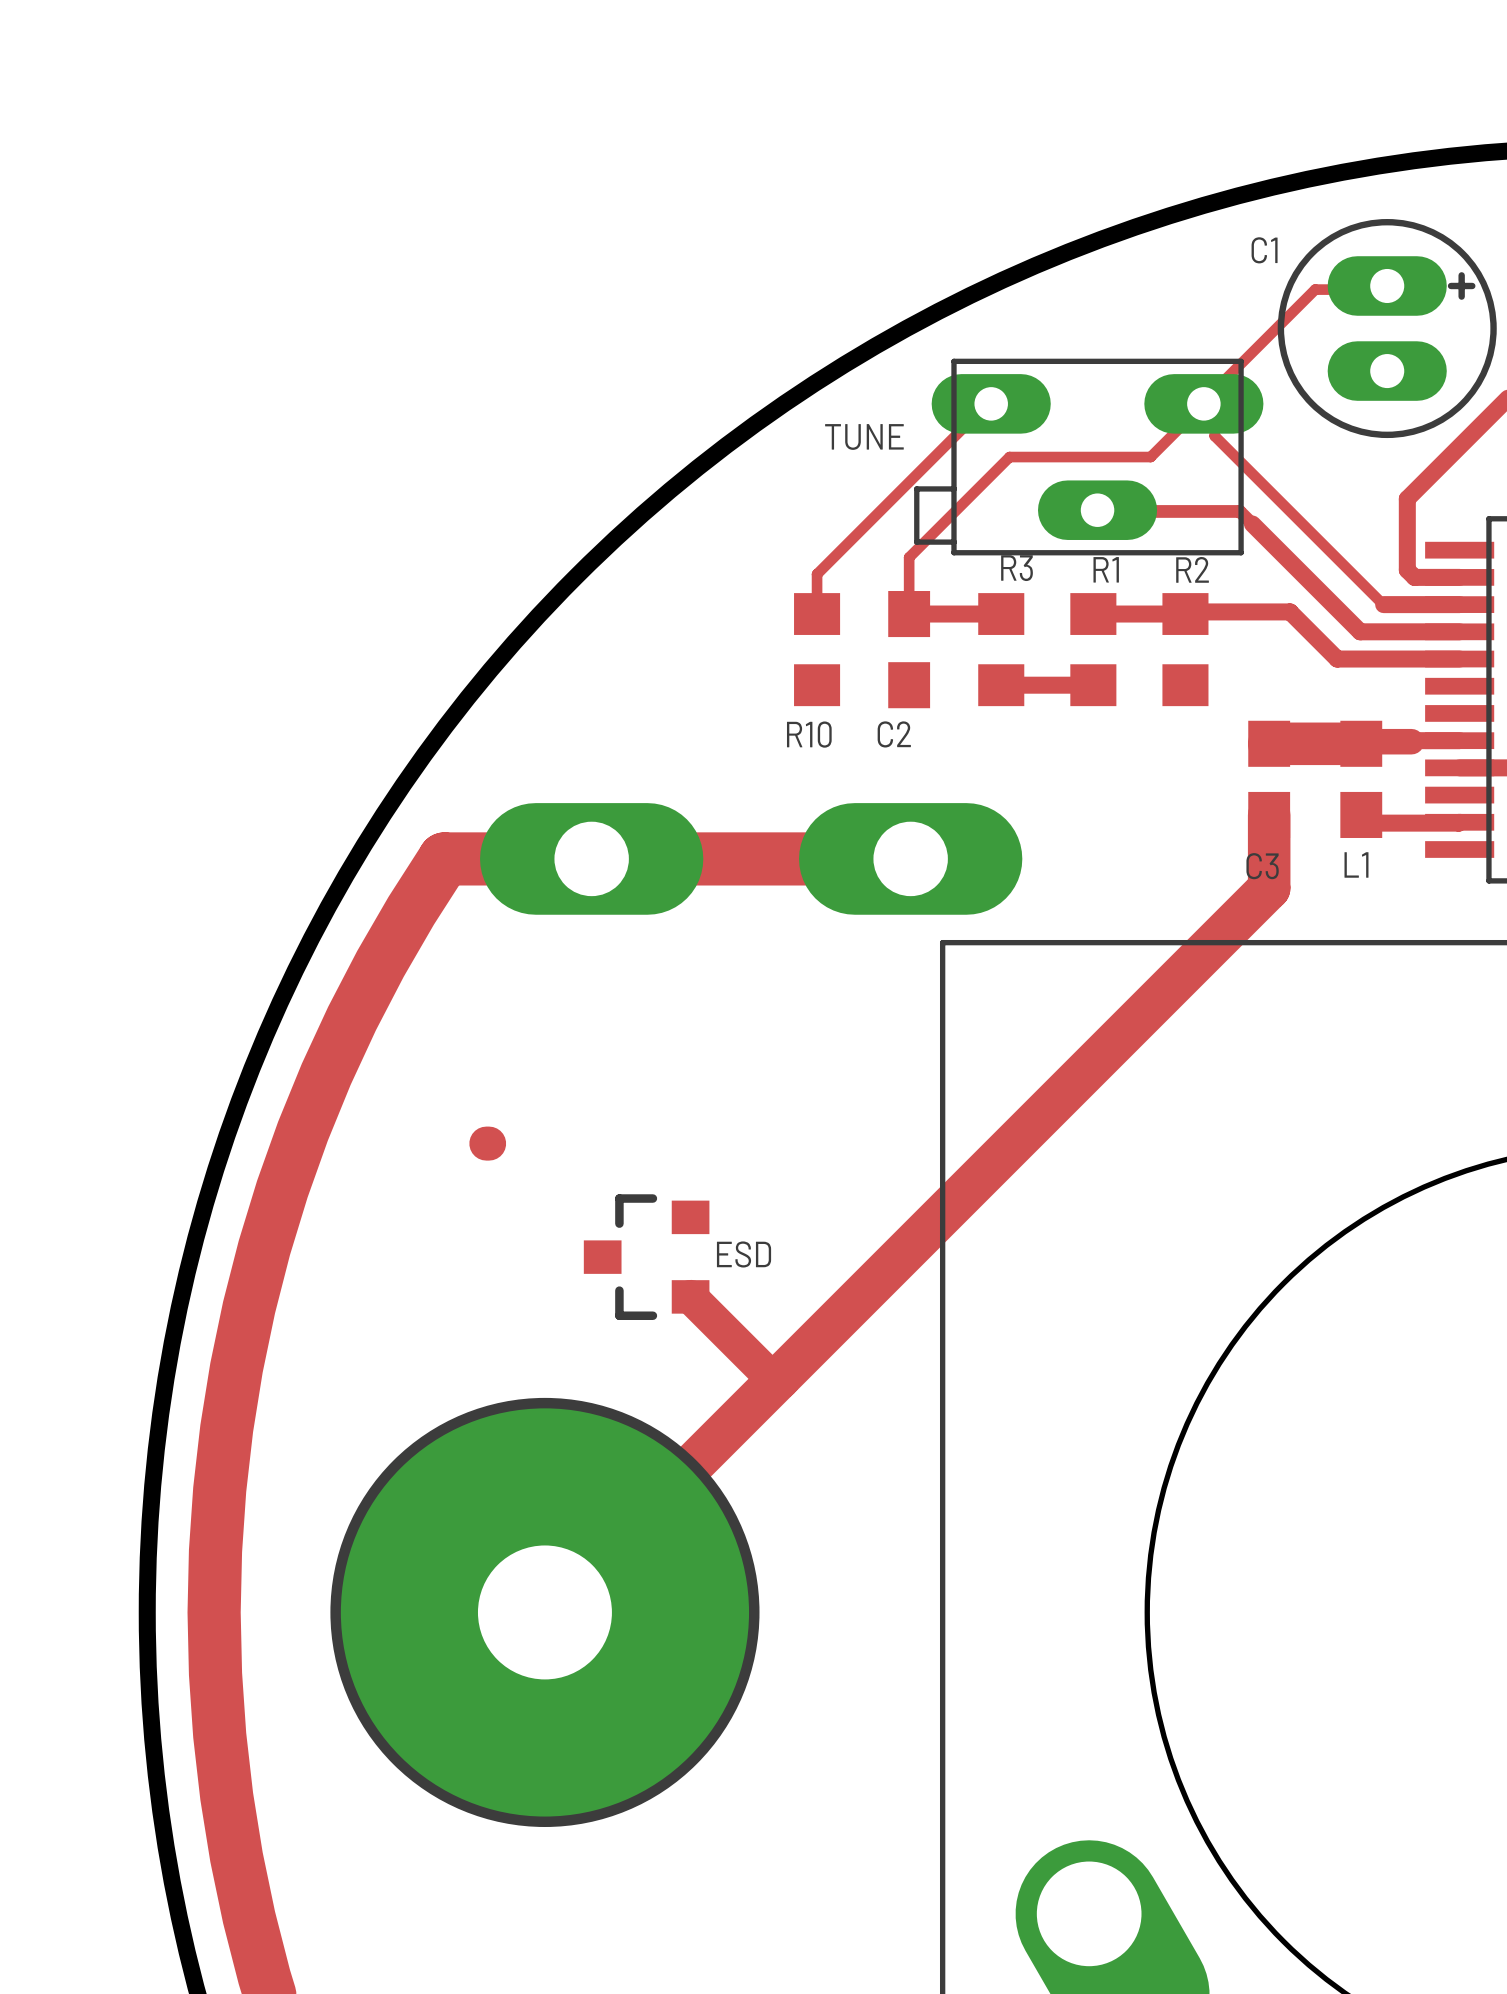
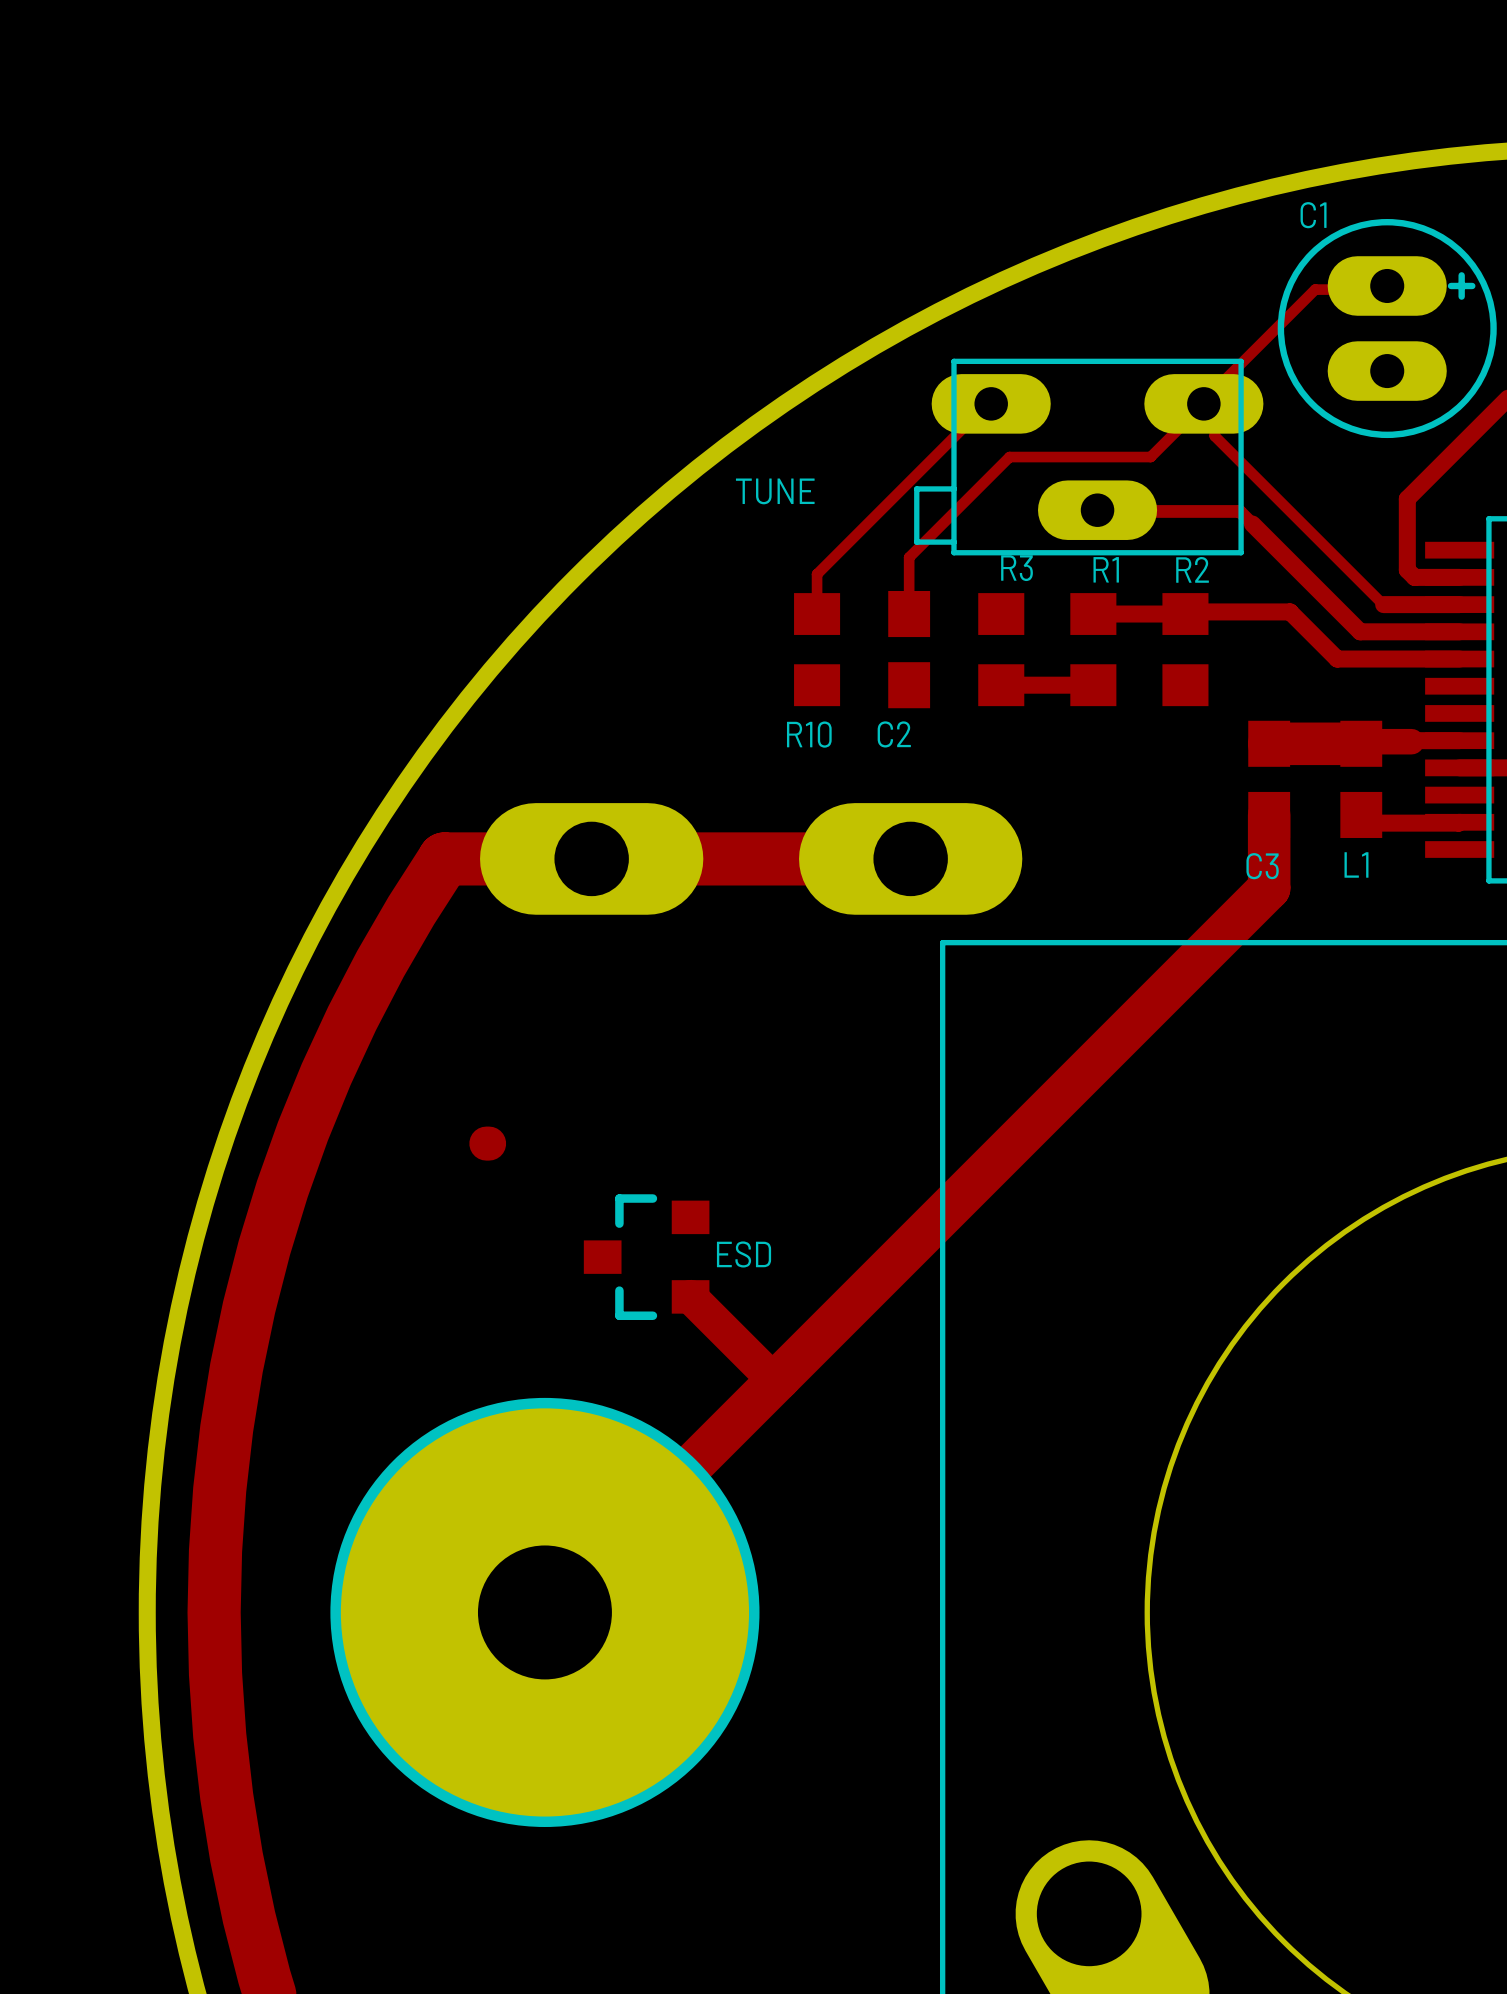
C1 name position: C1 (1264, 250) -> C1 (1313, 215)
text position: TUNE (864, 436) -> TUNE (775, 491)
top track: (909, 614) (1001, 614) -> none

